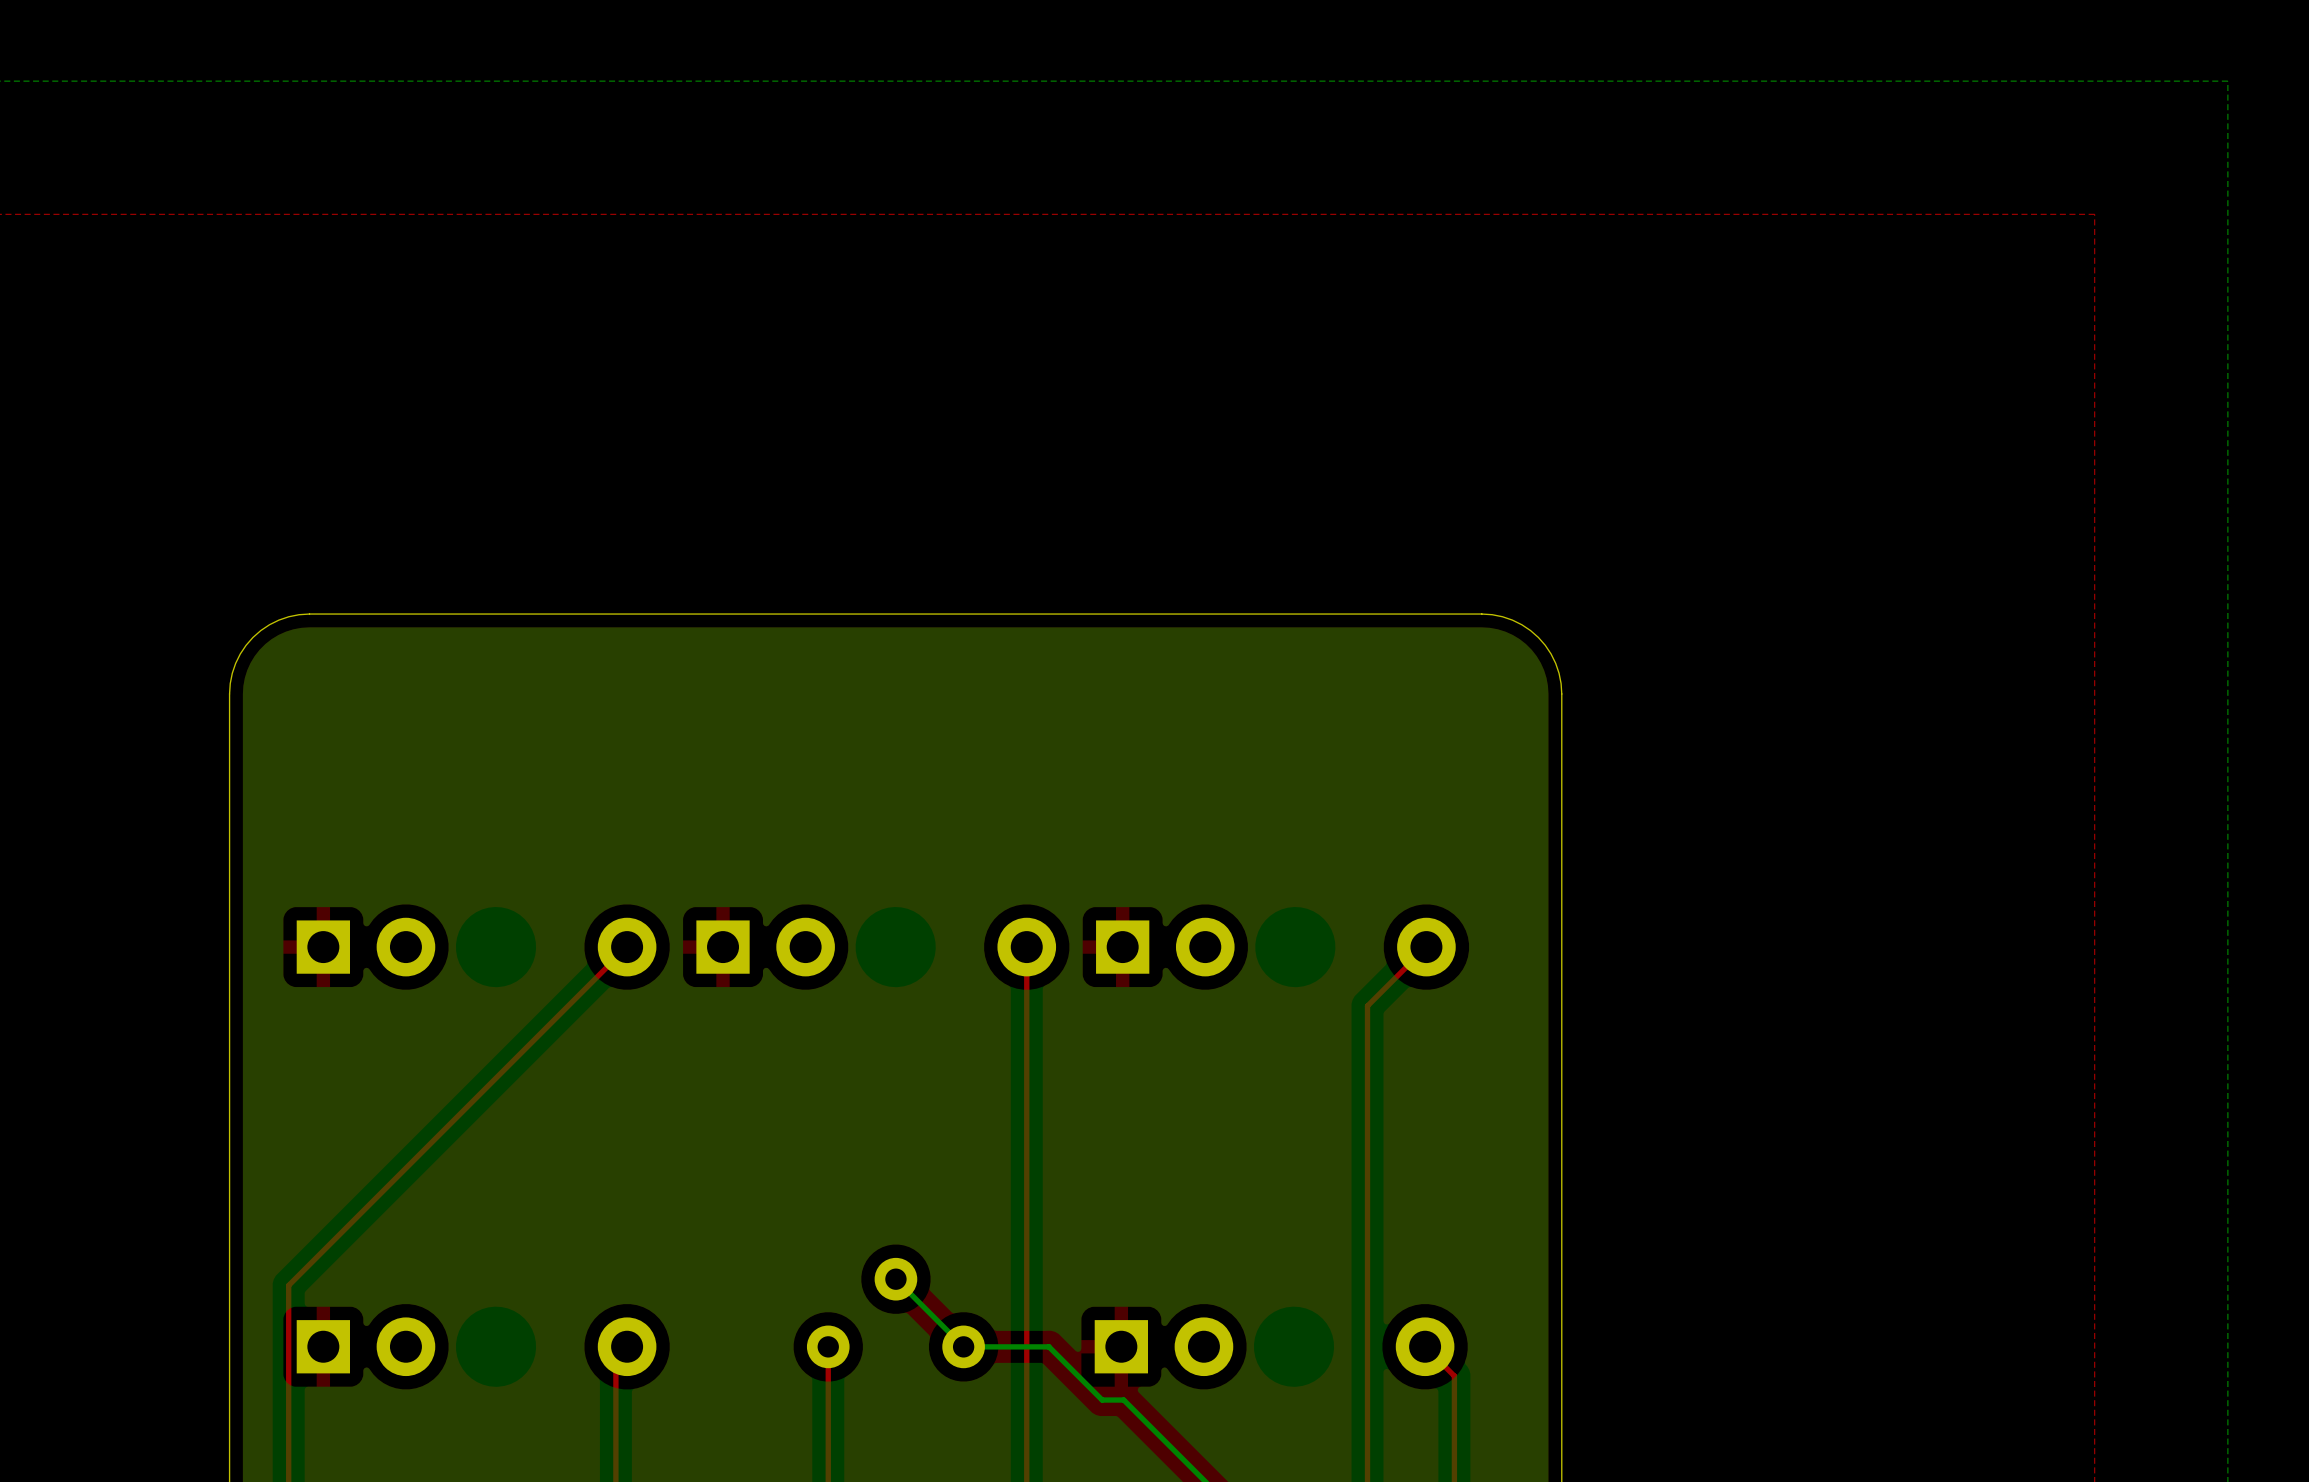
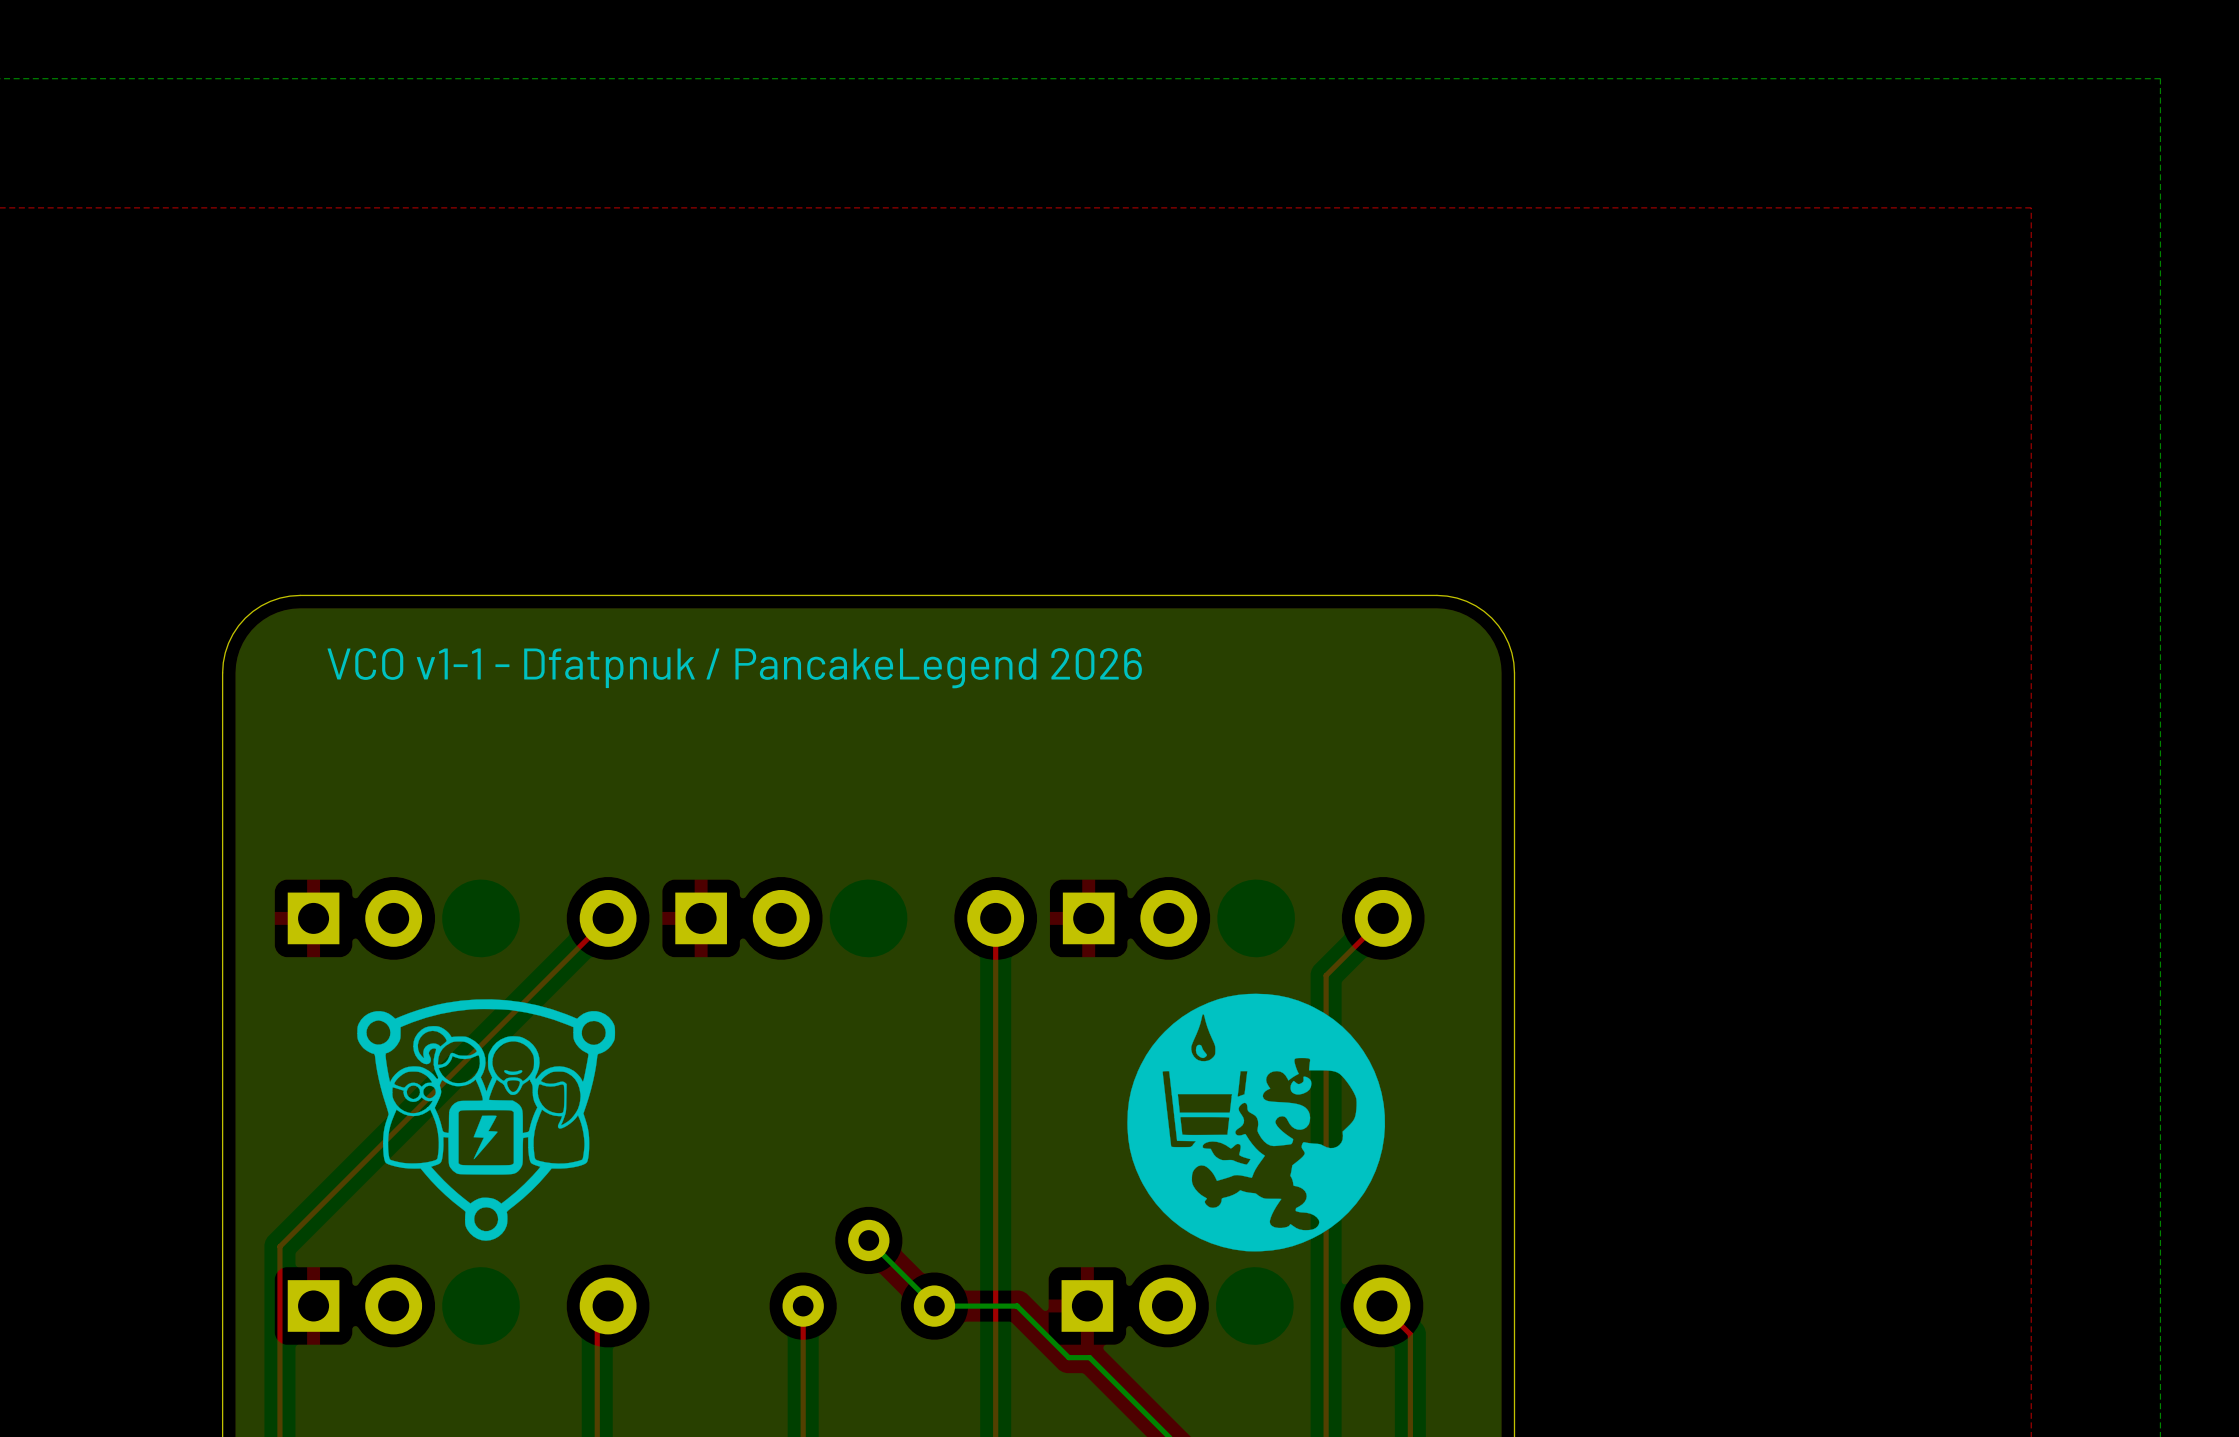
text: none -> VCO v1-1 - Dfatpnuk / PancakeLegend 2026 (734, 668)
drawing: none -> [1127, 993, 1386, 1252]
drawing: none -> [357, 999, 616, 1241]

